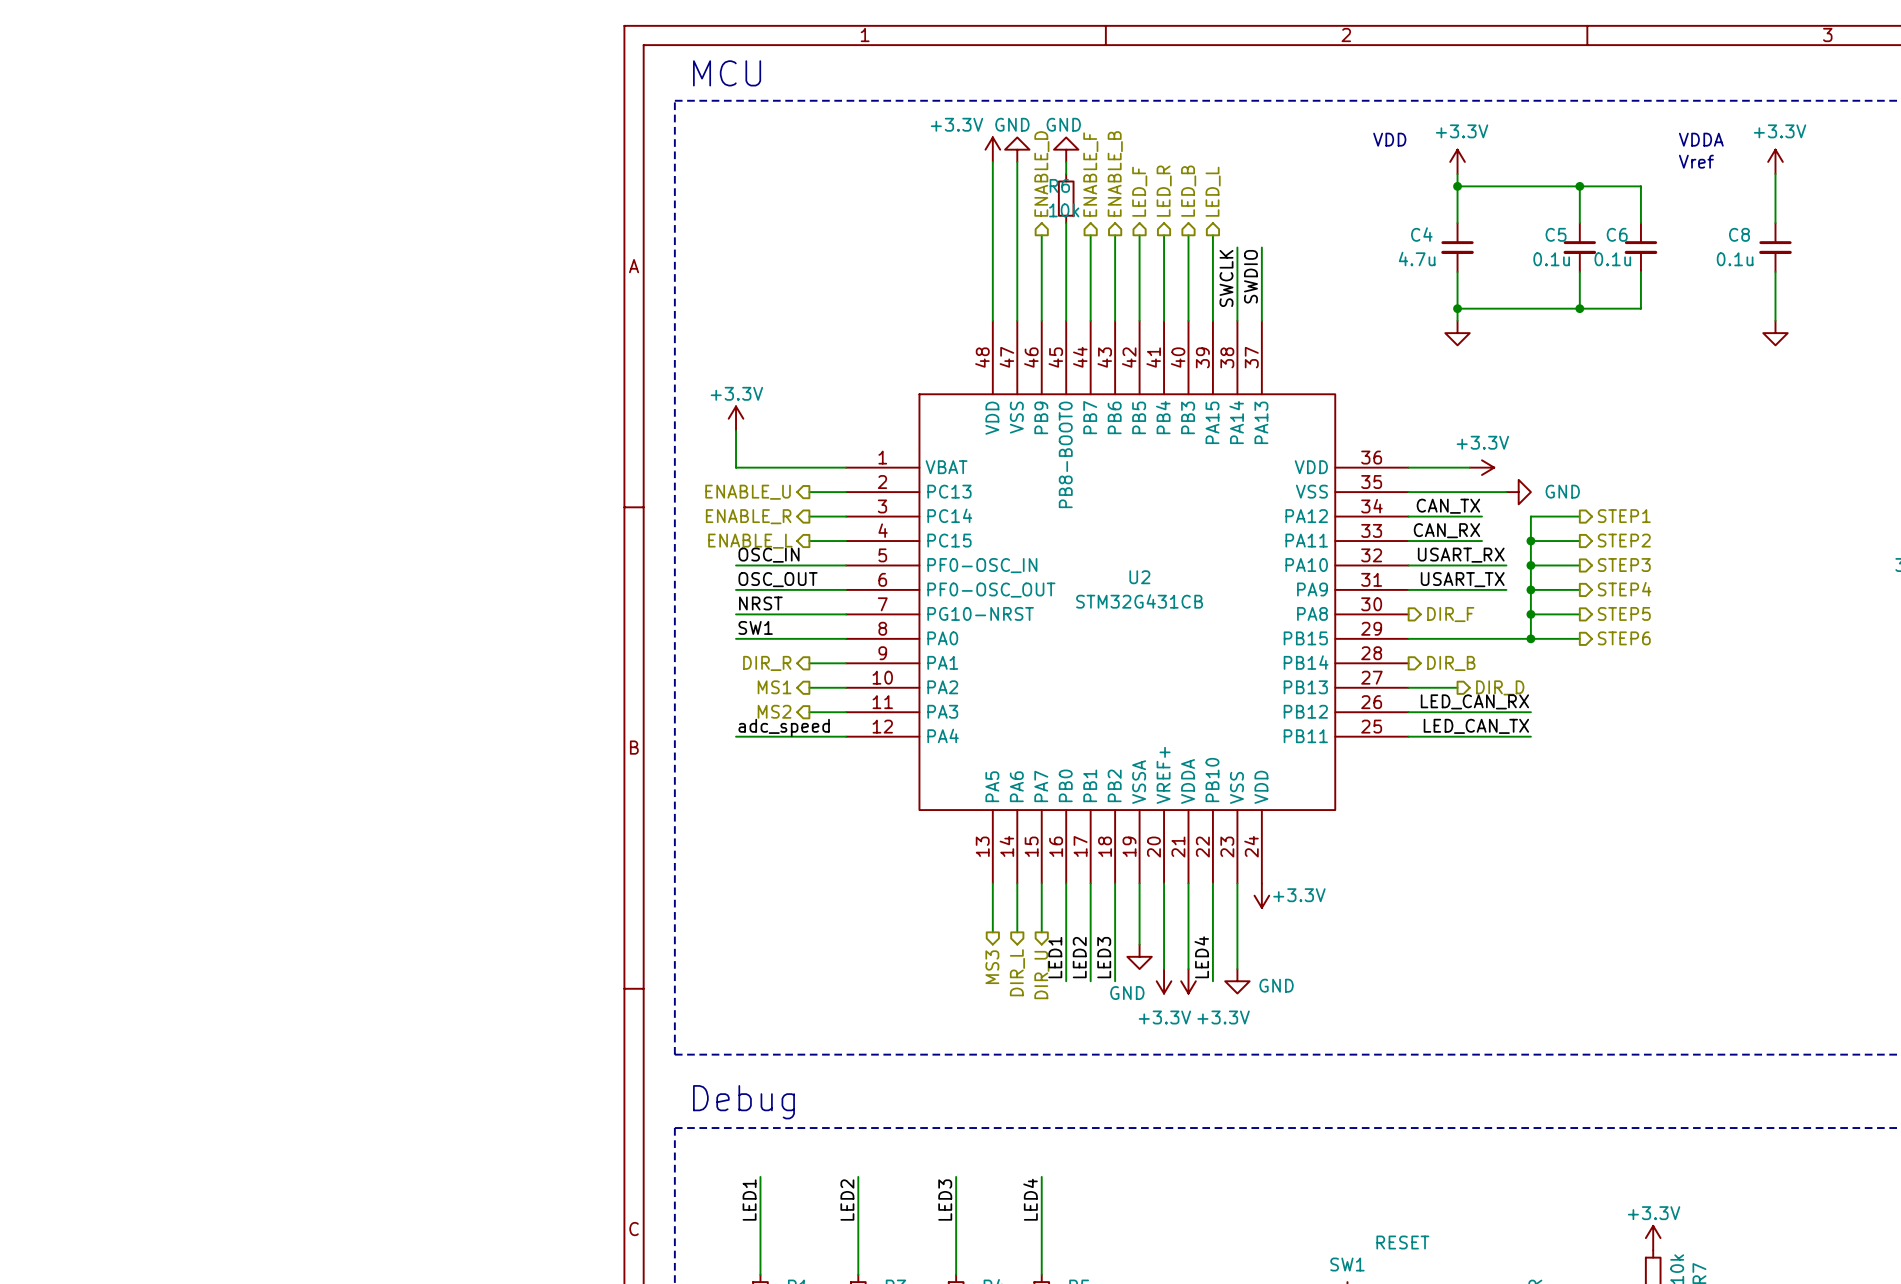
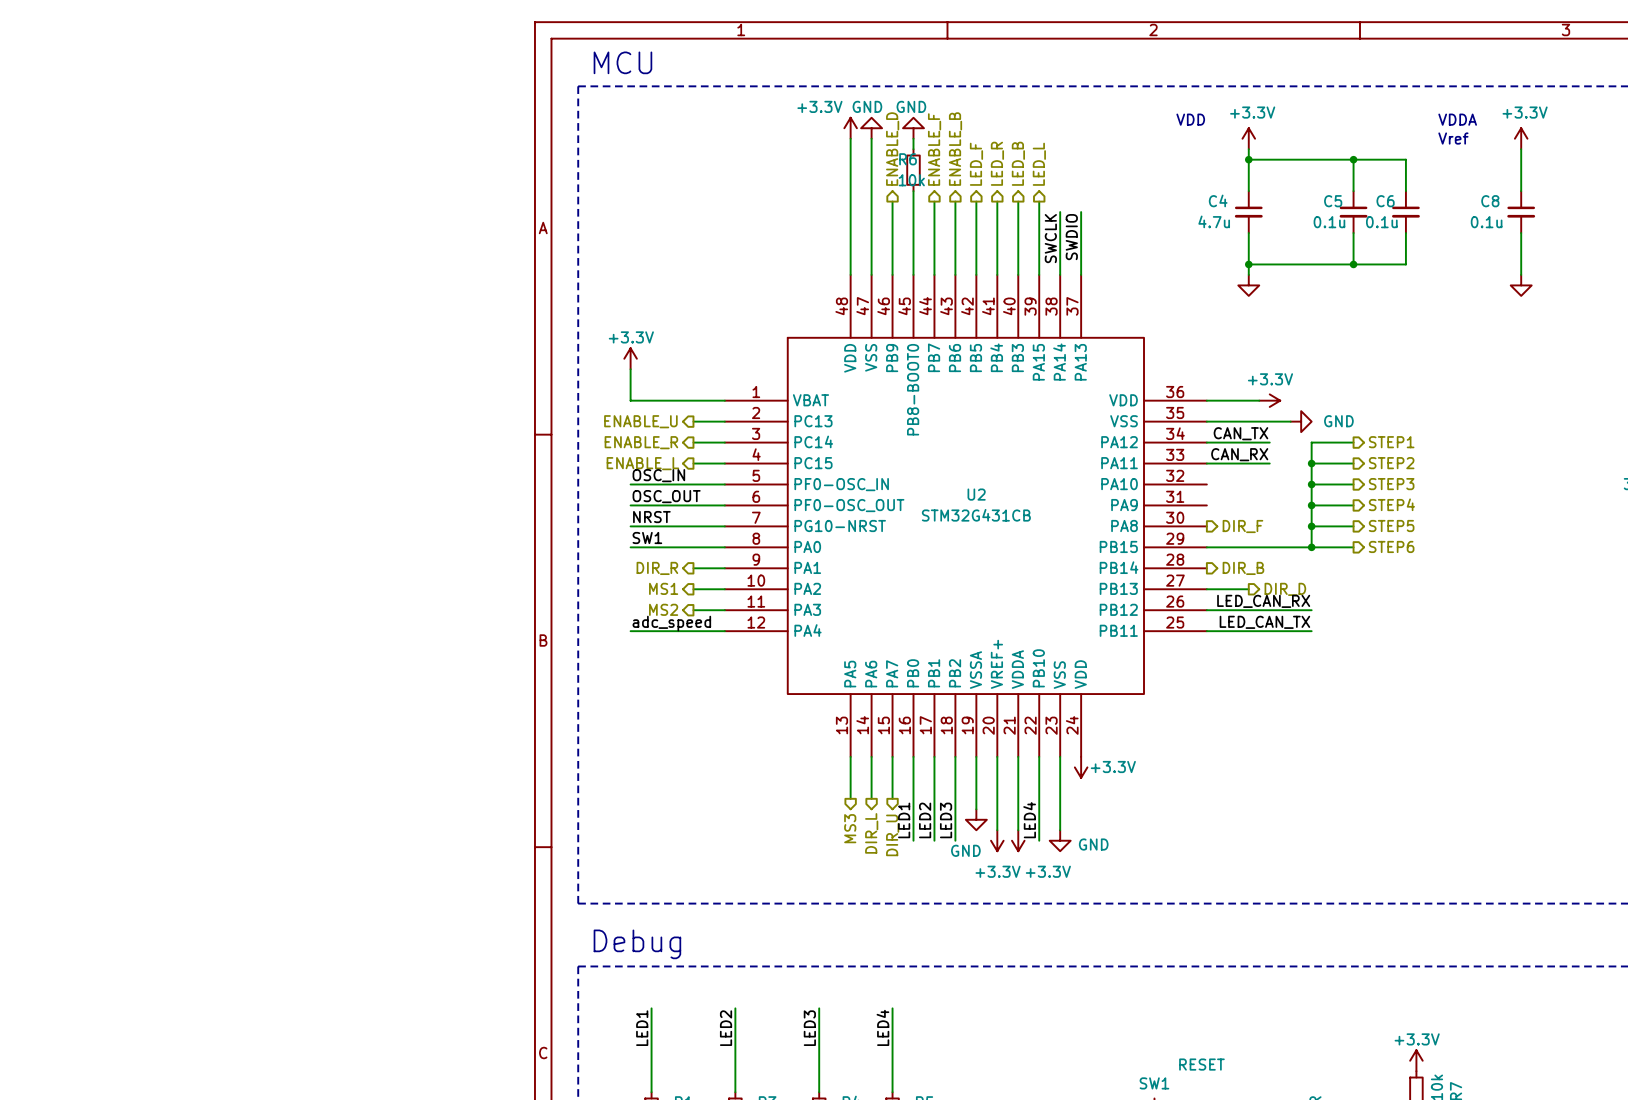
label: USART_RX (1461, 555) -> none
wire: (1408, 565) (1506, 565) -> none
label: USART_TX (1462, 579) -> none
wire: (1408, 589) (1506, 589) -> none

